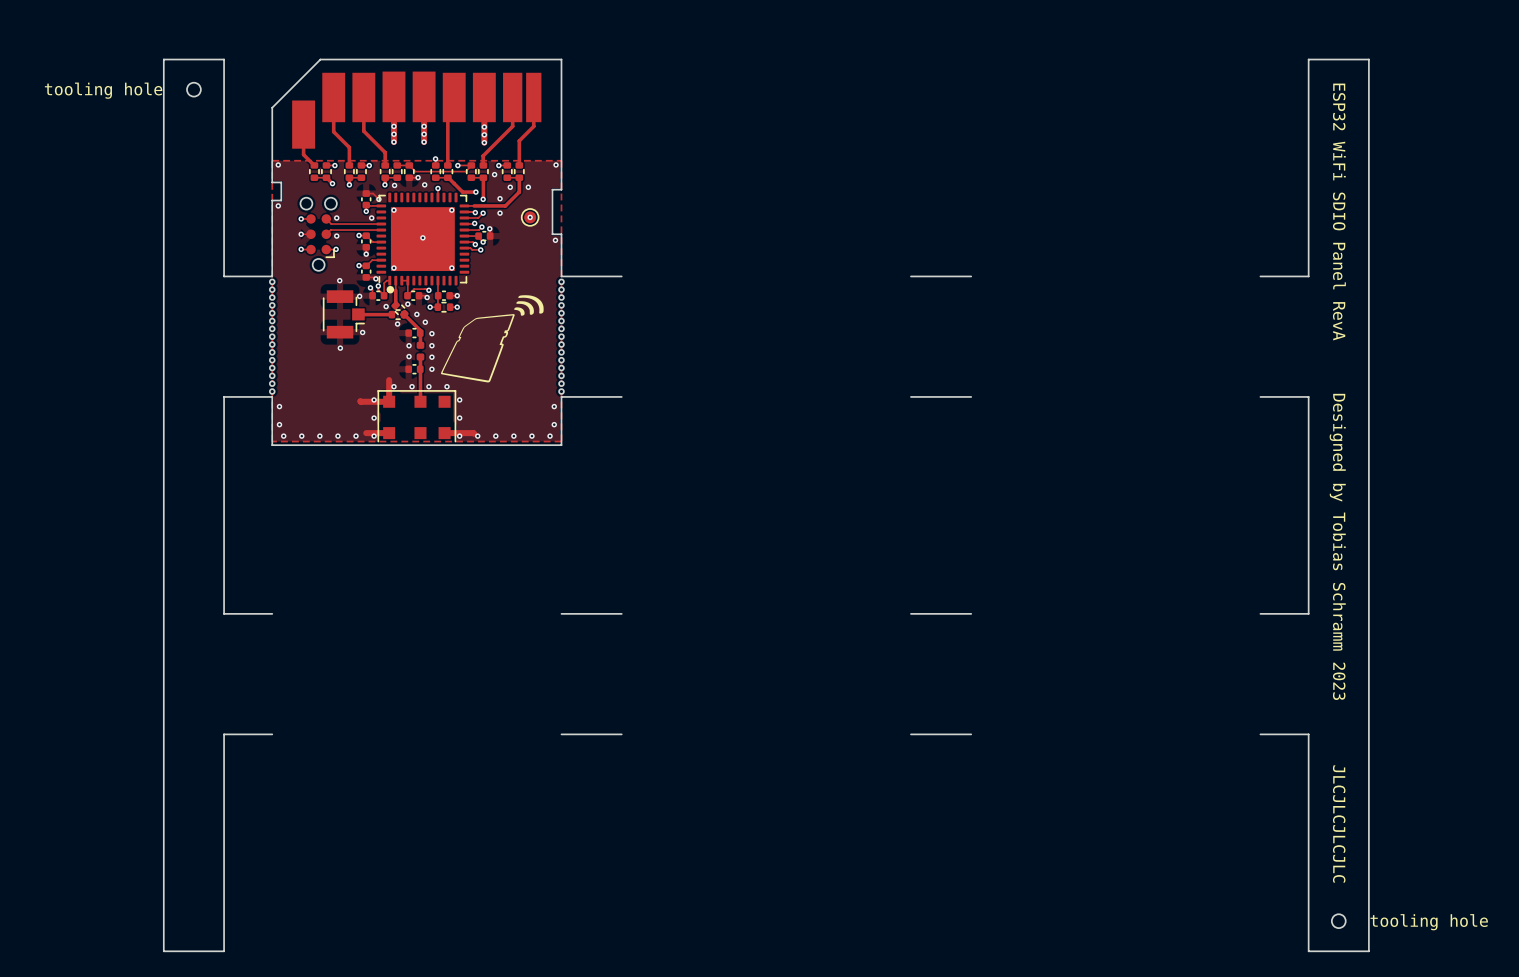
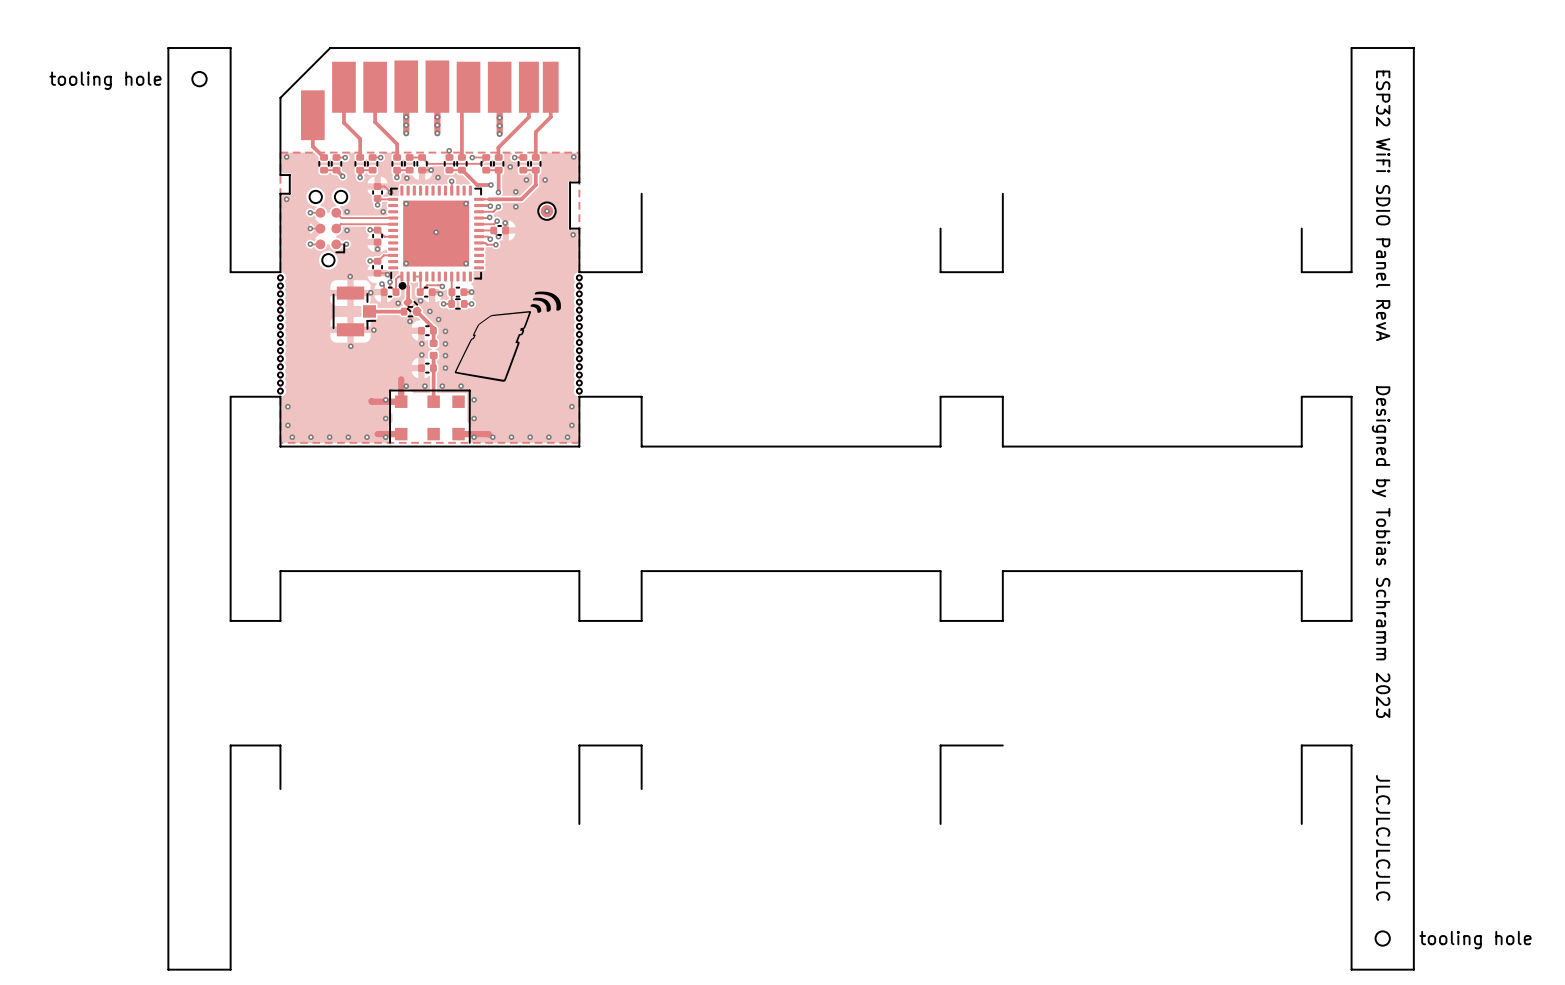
board edge: none -> (641, 193) (641, 272)
board edge: none -> (1002, 193) (1002, 272)
board edge: none -> (940, 228) (940, 272)
board edge: none -> (1301, 228) (1301, 272)
board edge: none -> (641, 396) (641, 446) (940, 446) (940, 396)
board edge: none -> (1002, 396) (1002, 446) (1301, 446) (1301, 396)
board edge: none -> (280, 620) (280, 571) (579, 571) (579, 620)
board edge: none -> (641, 620) (641, 571) (940, 571) (940, 620)
board edge: none -> (1002, 620) (1002, 571) (1301, 571) (1301, 620)
board edge: none -> (280, 745) (280, 789)
board edge: none -> (579, 745) (579, 823)
board edge: none -> (641, 745) (641, 789)
board edge: none -> (940, 745) (940, 823)
board edge: none -> (1301, 745) (1301, 823)

